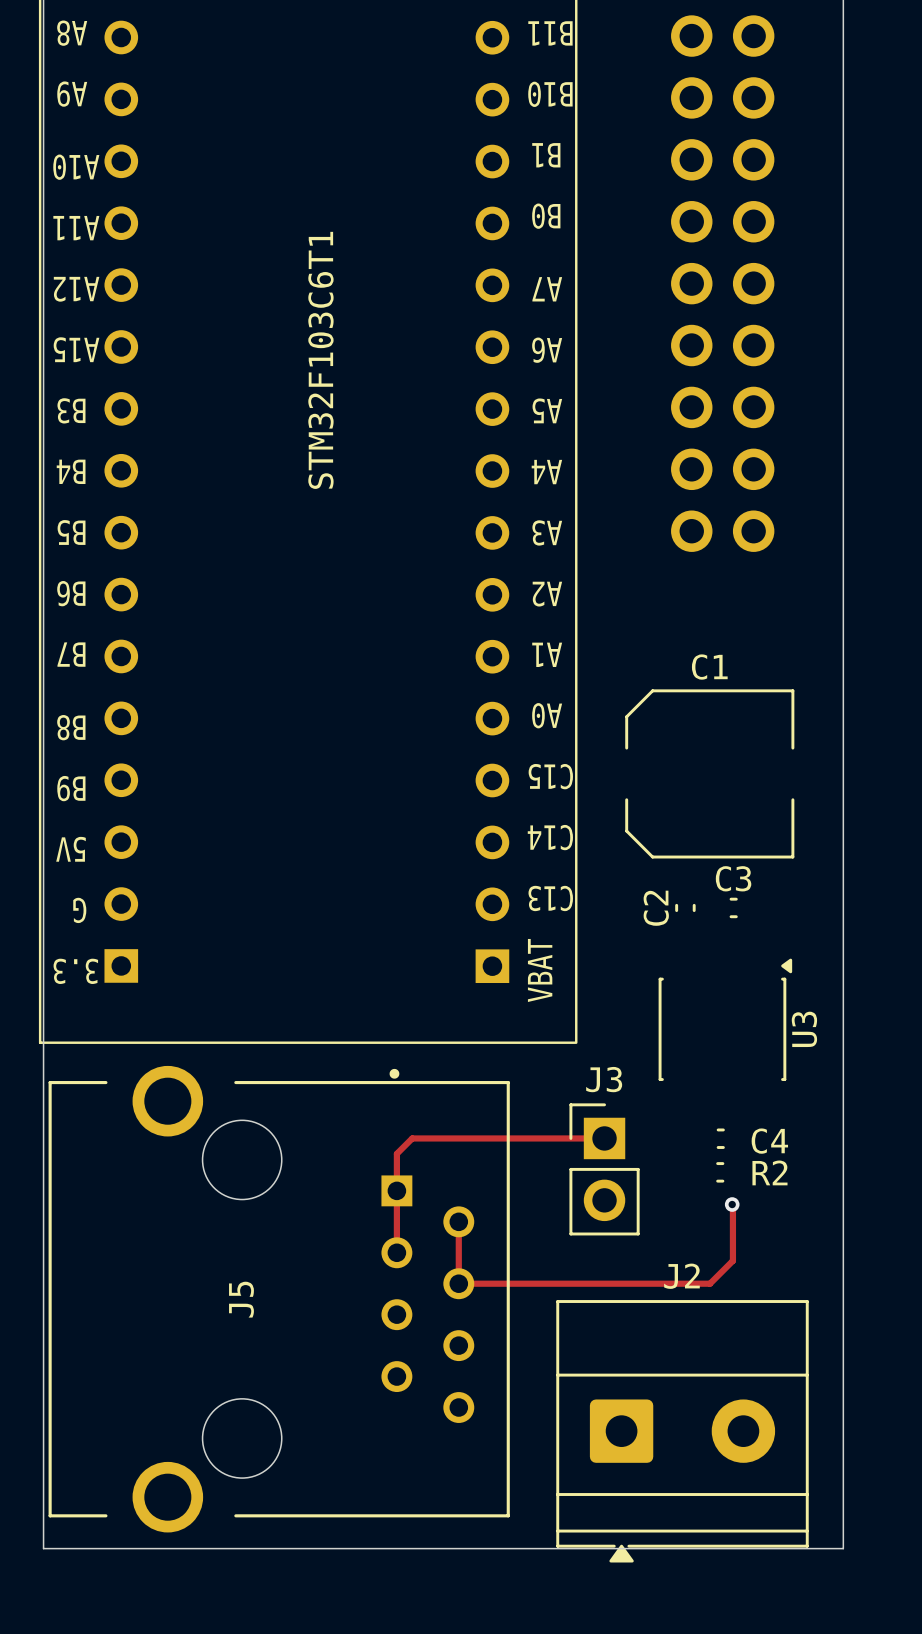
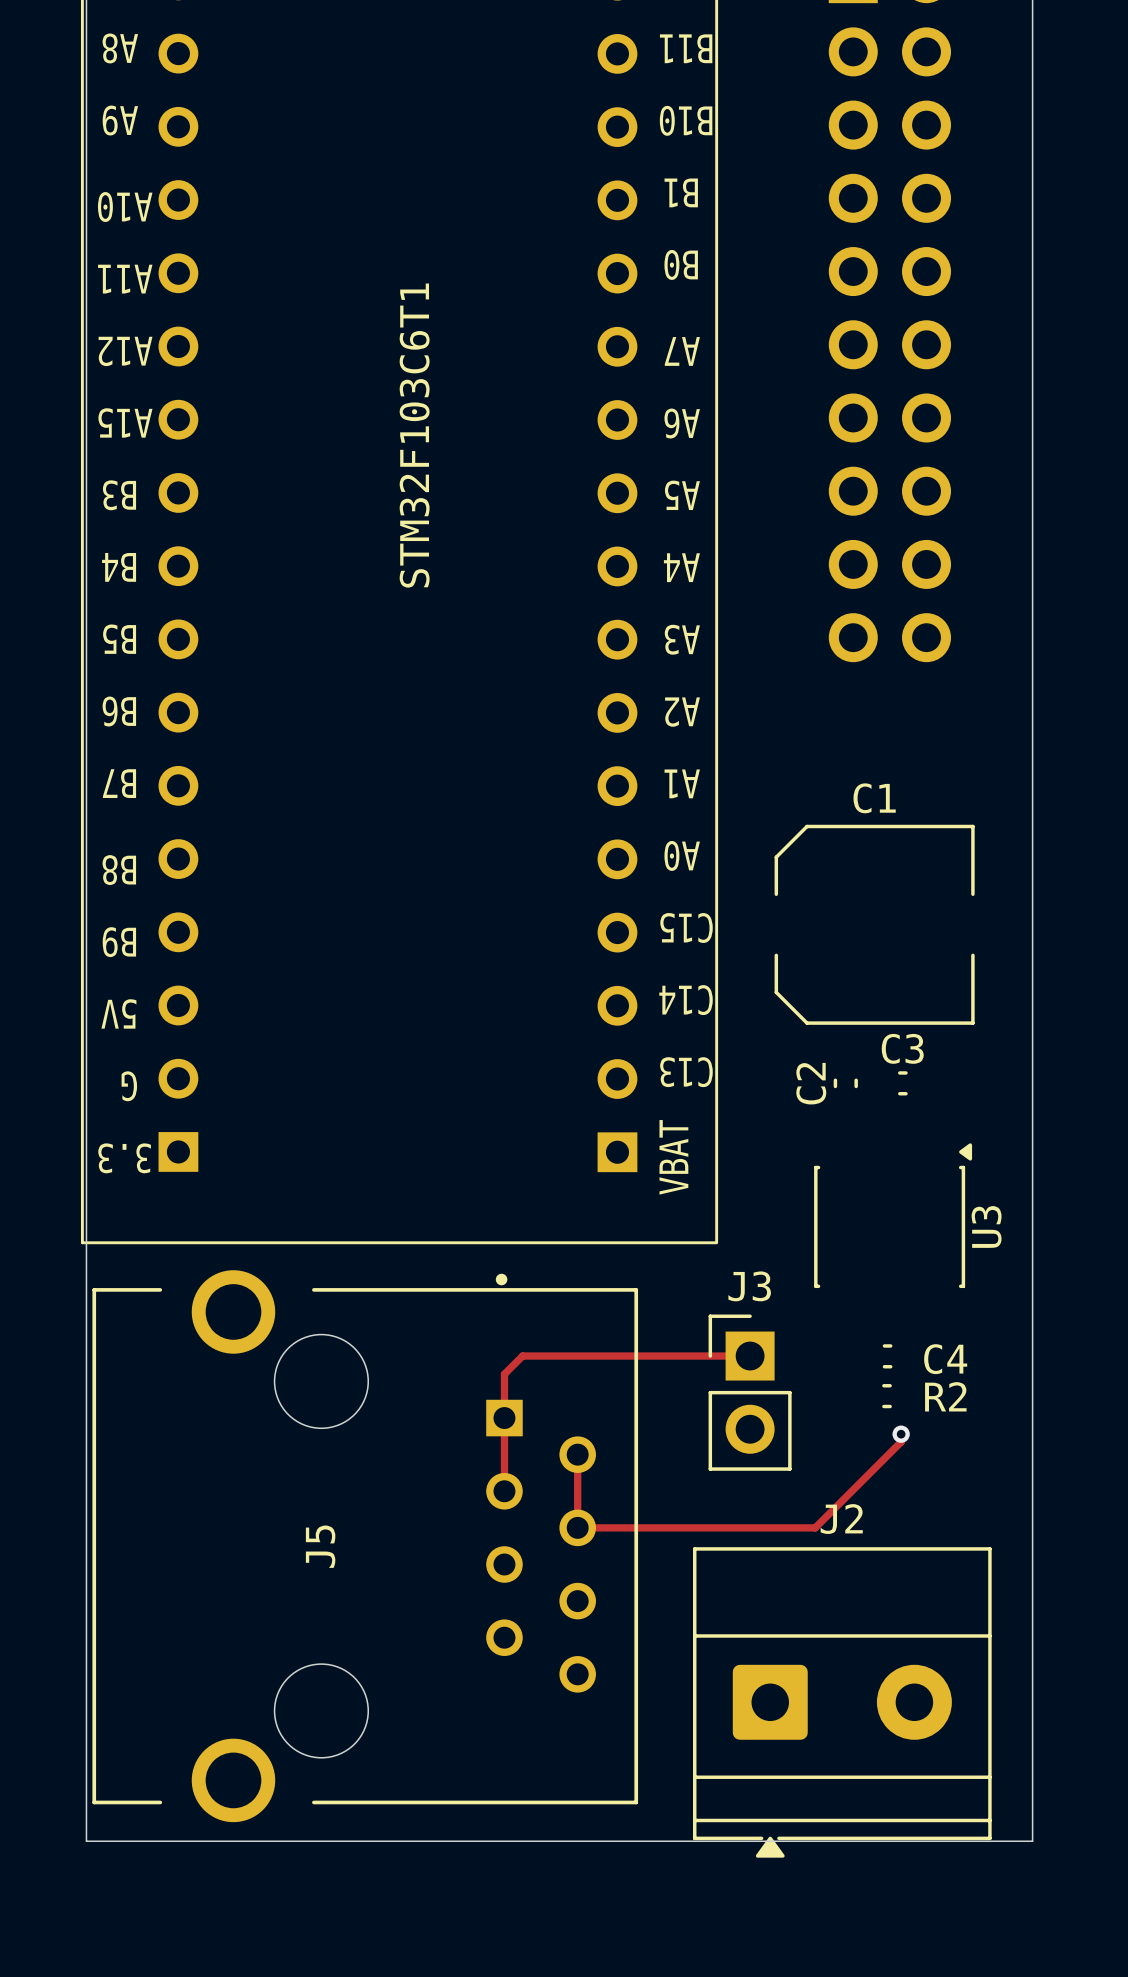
track: (732, 1208) (732, 1260) (710, 1283) (659, 1283) -> (901, 1439) (901, 1441) (815, 1527)

